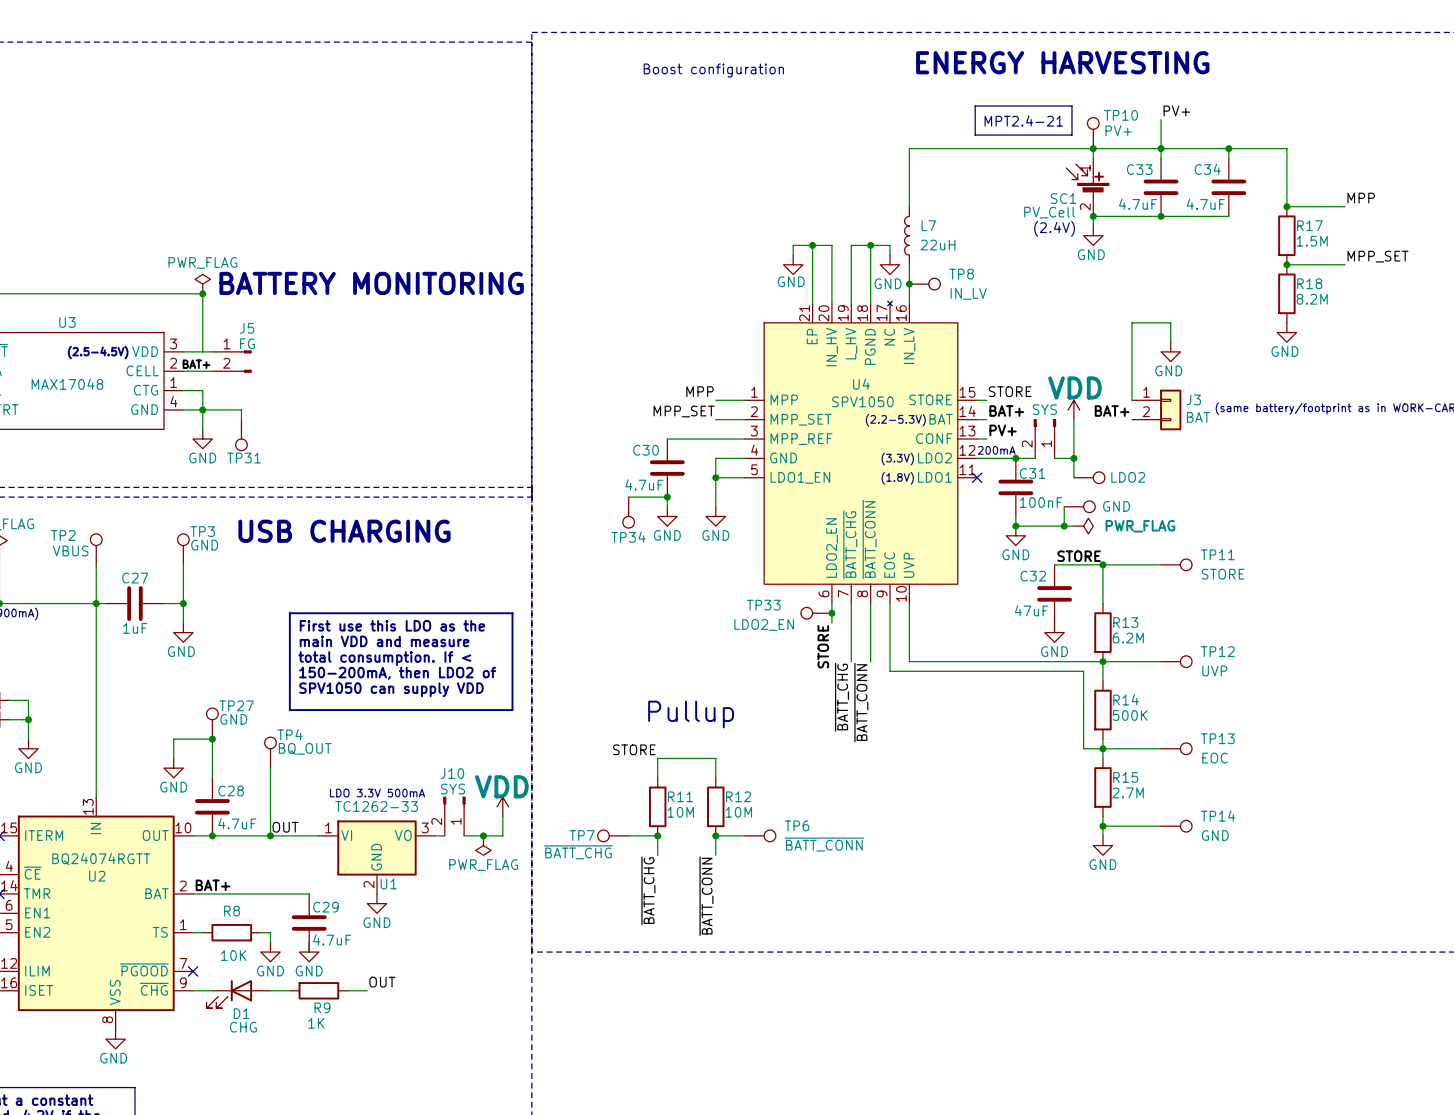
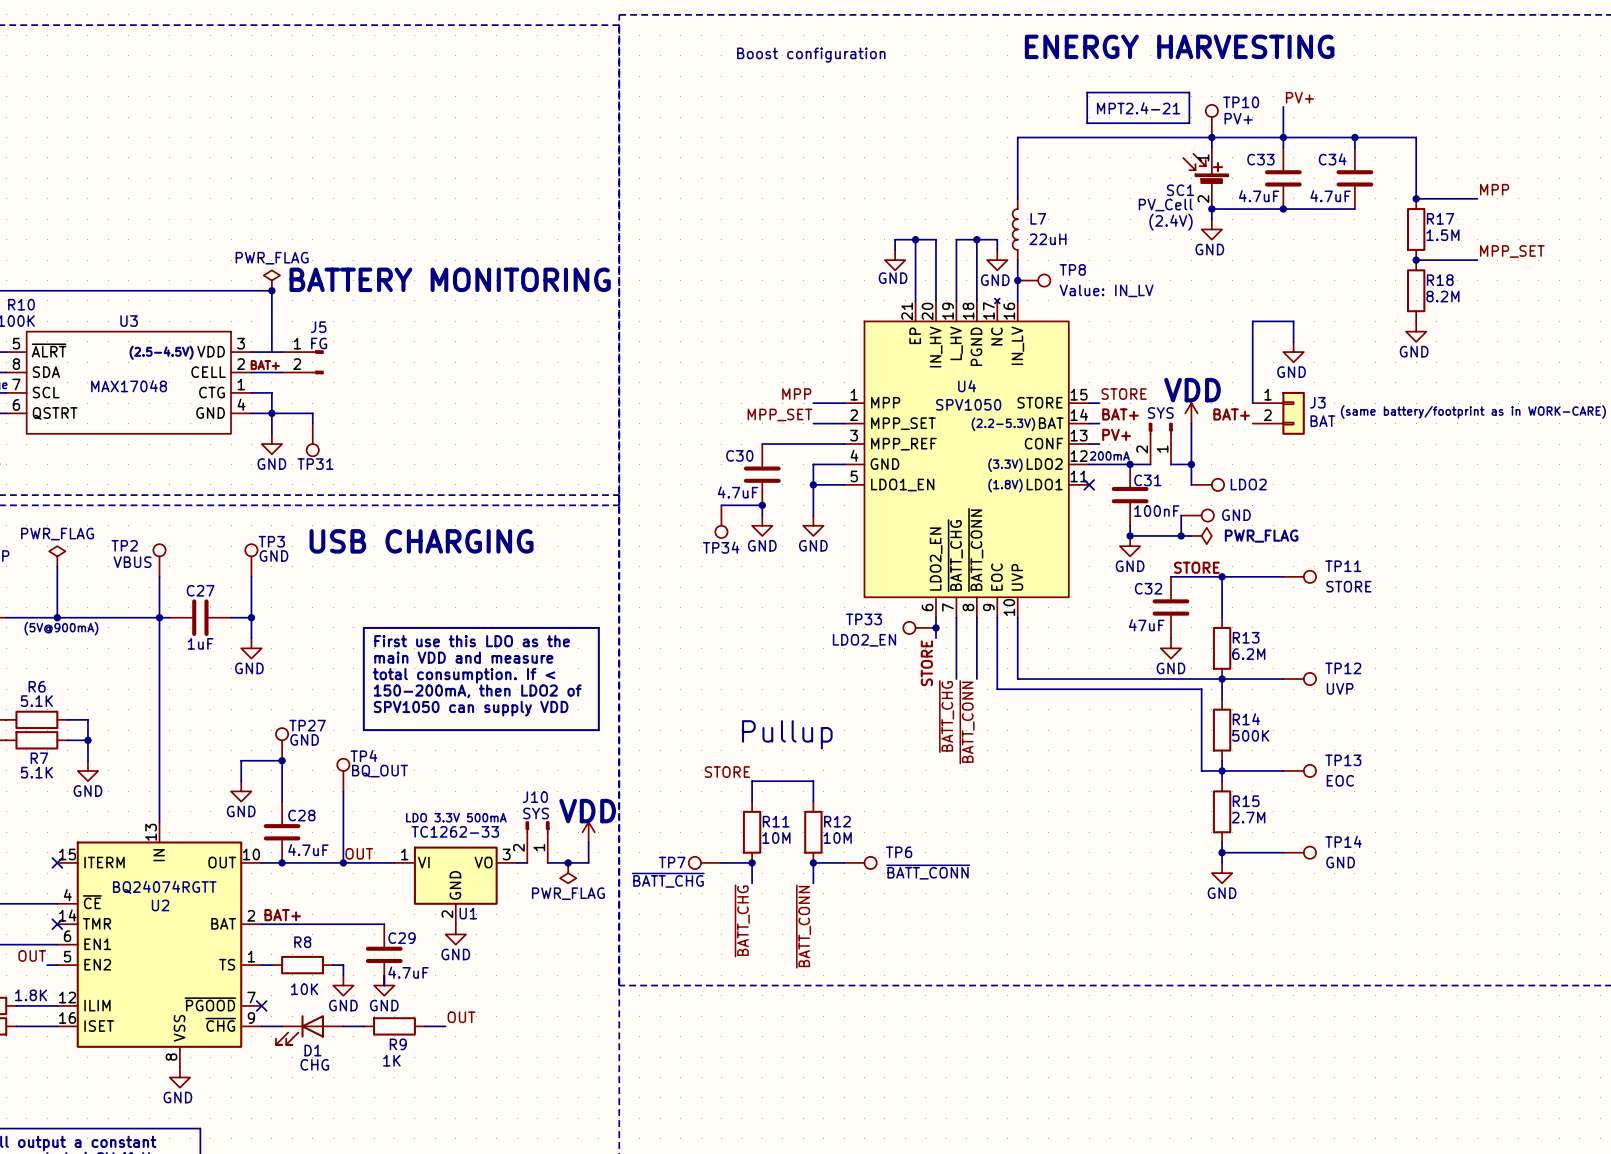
TP8 value: IN_LV (968, 293) -> Value: IN_LV (1106, 290)

